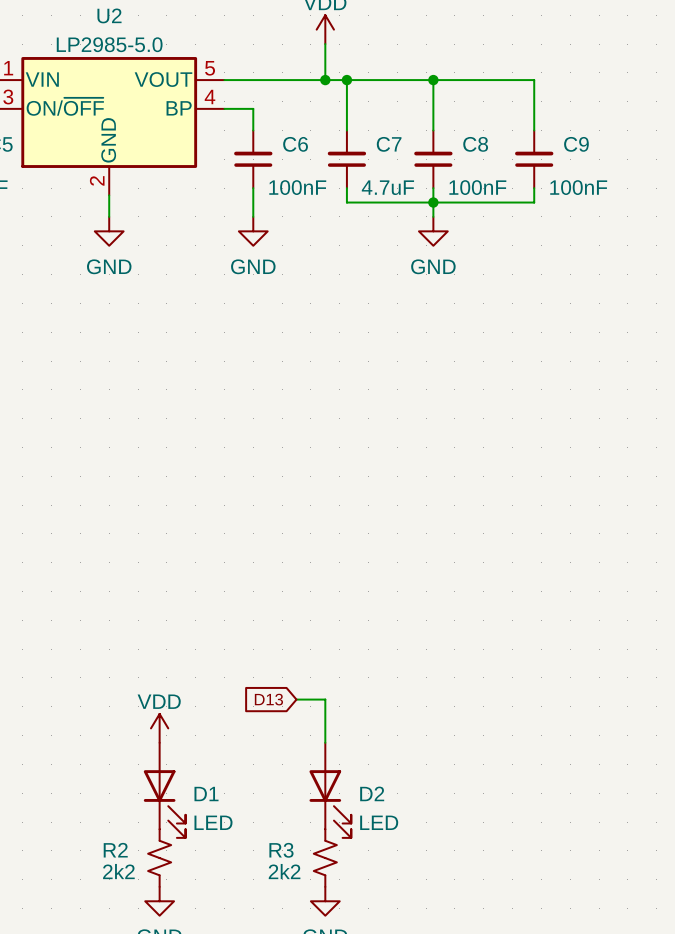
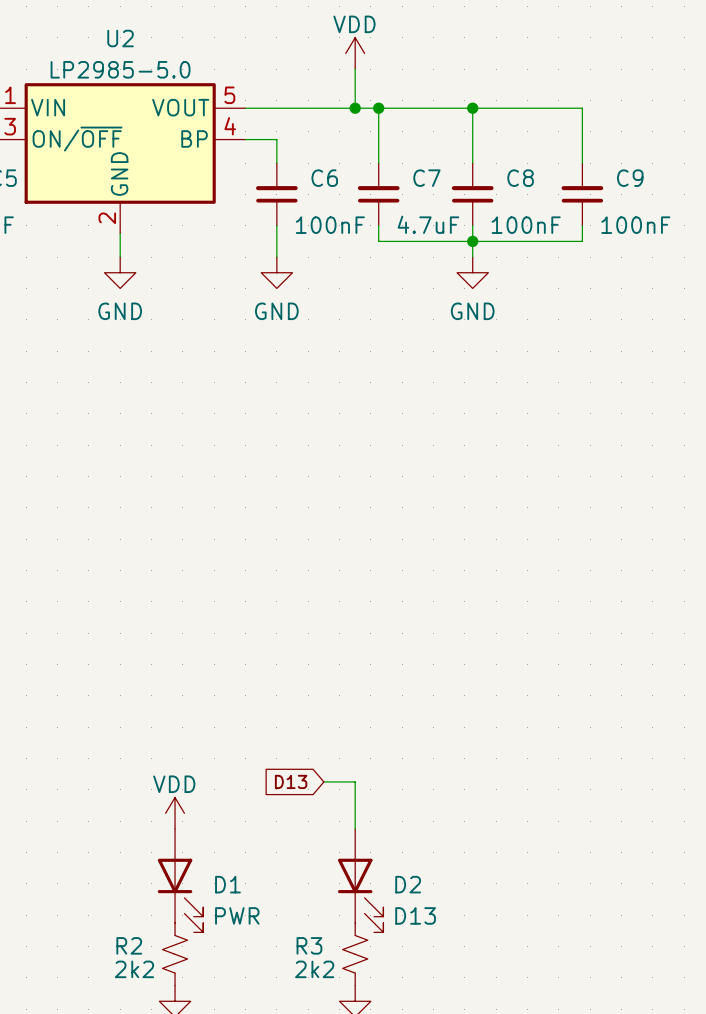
D1 value: LED (213, 822) -> PWR (237, 915)
D2 value: LED (379, 822) -> D13 (415, 915)

